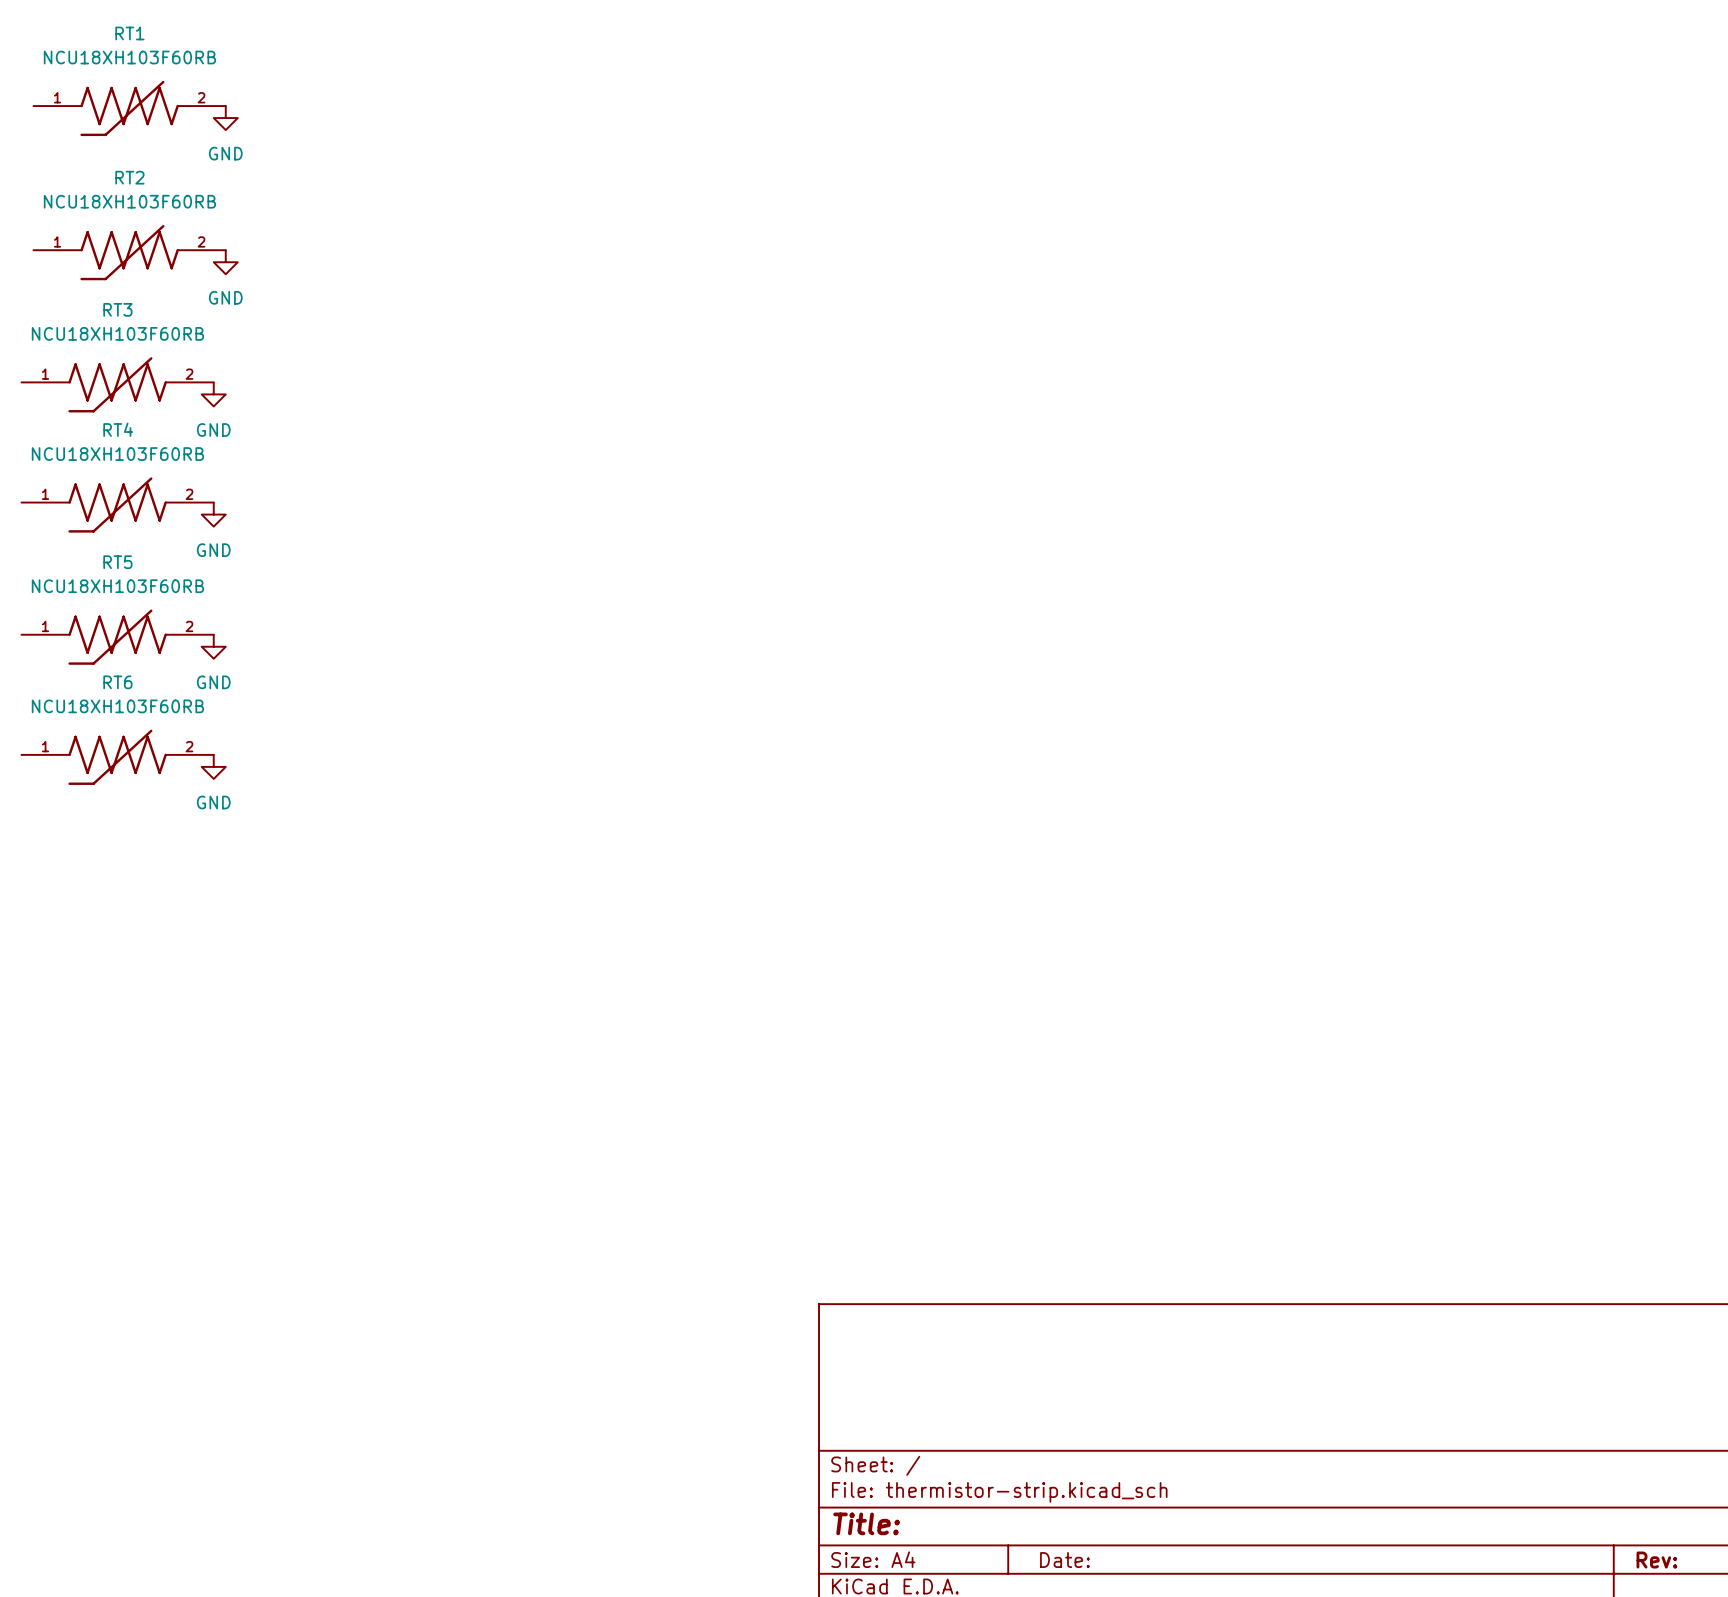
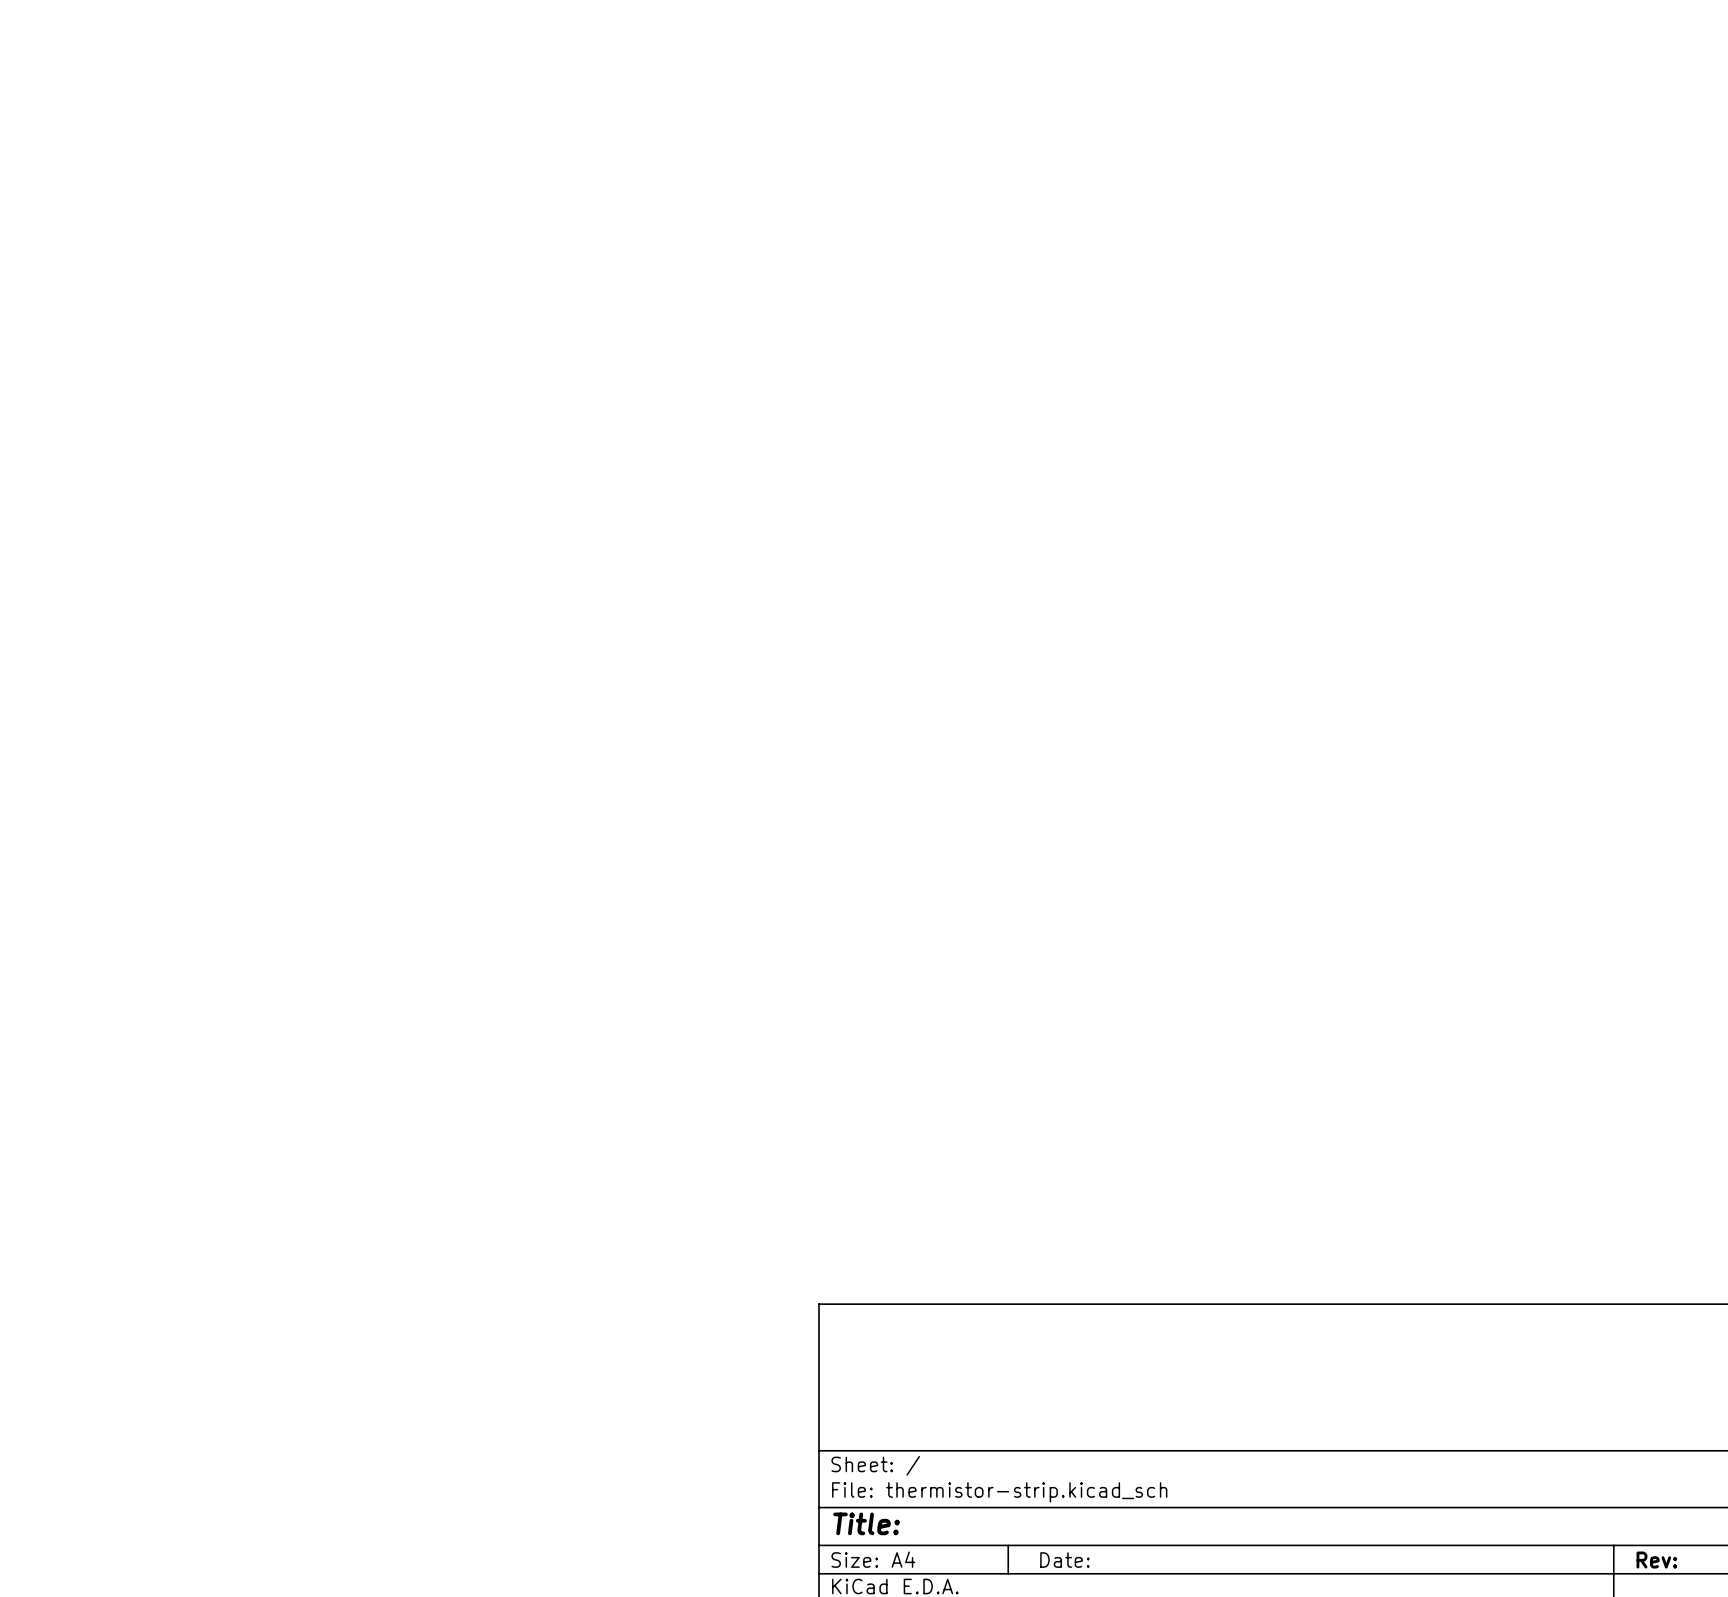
RT1: NCU18XH103F60RB (129, 108) -> none
power symbol: GND (225, 118) -> none
RT2: NCU18XH103F60RB (129, 252) -> none
power symbol: GND (225, 262) -> none
RT3: NCU18XH103F60RB (117, 384) -> none
power symbol: GND (213, 394) -> none
RT4: NCU18XH103F60RB (117, 504) -> none
power symbol: GND (213, 514) -> none
RT5: NCU18XH103F60RB (117, 637) -> none
power symbol: GND (213, 646) -> none
RT6: NCU18XH103F60RB (117, 757) -> none
power symbol: GND (213, 766) -> none

